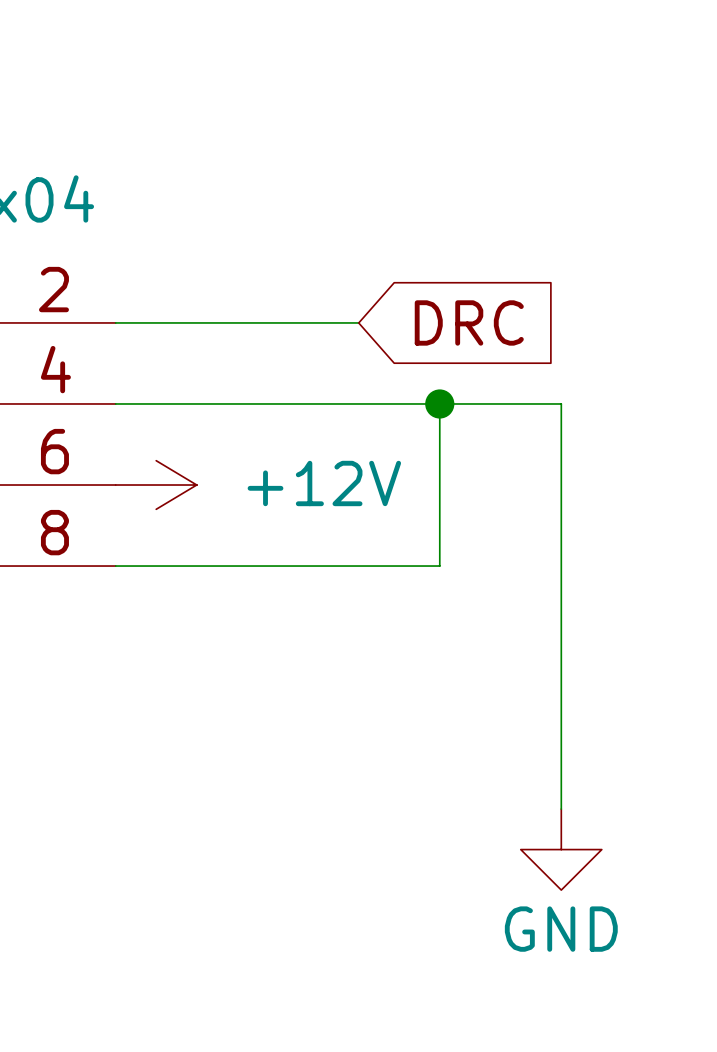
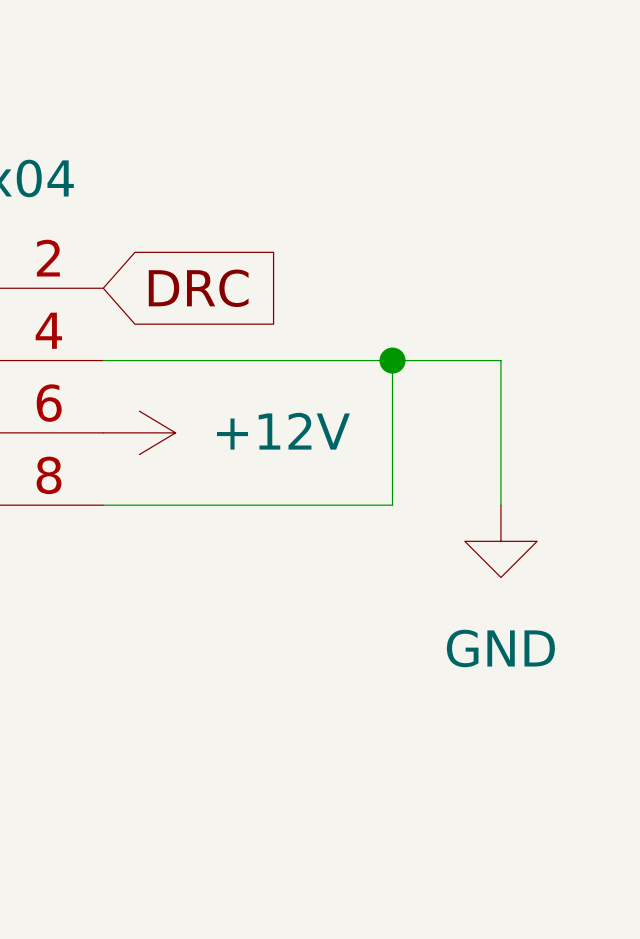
wire: (115, 322) (358, 322) -> none
global label position: DRC (469, 322) -> DRC (198, 288)
wire: (561, 566) (561, 809) -> none
power symbol position: GND (561, 849) -> GND (500, 541)
power symbol text position: GND (561, 929) -> GND (500, 648)

